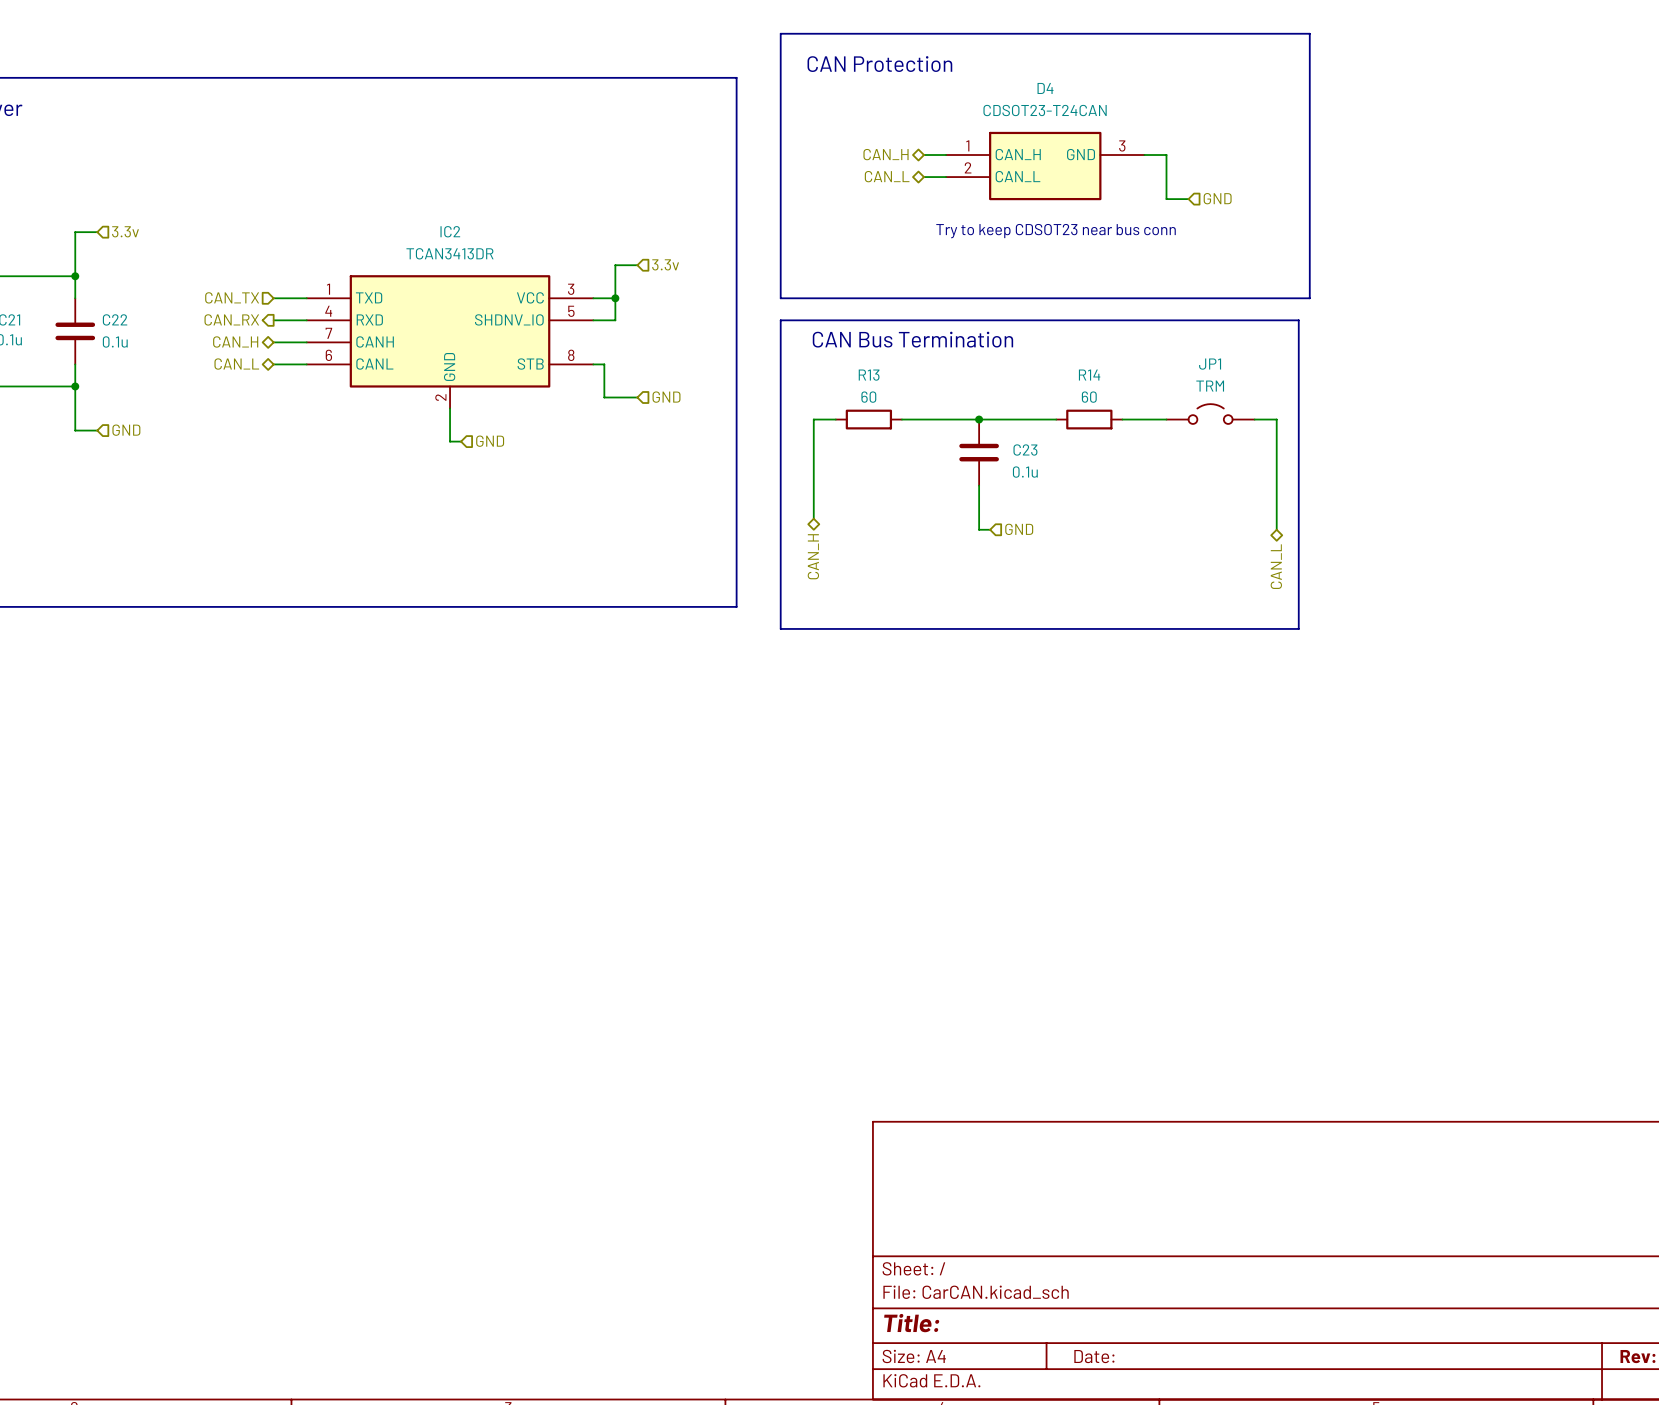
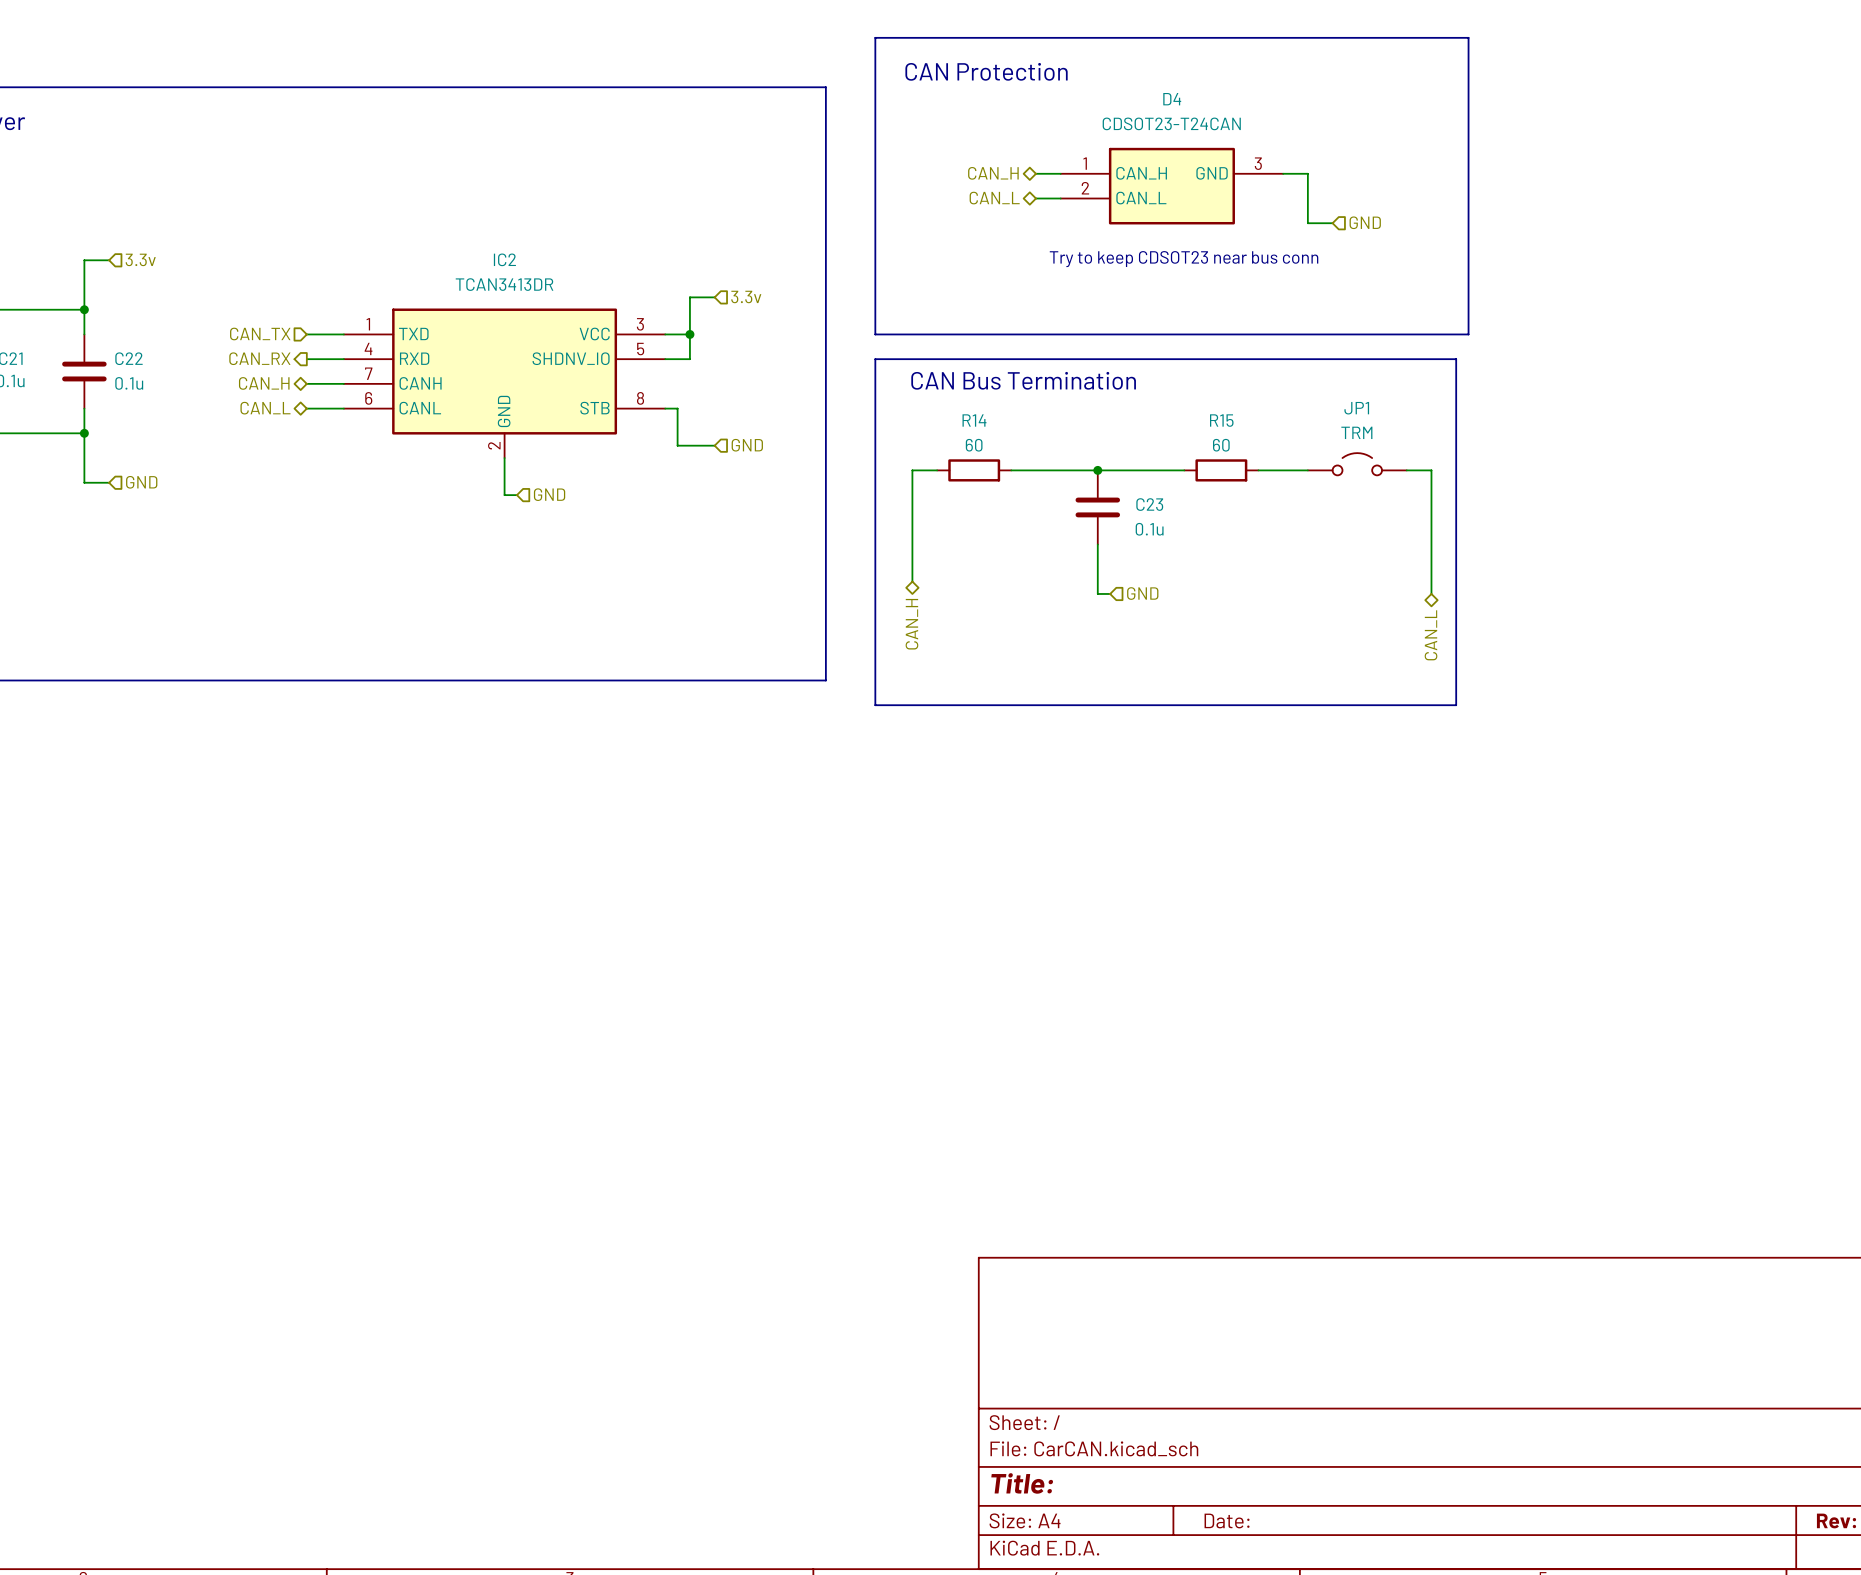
R13 name: R13 (869, 375) -> R14 (974, 420)
R14 name: R14 (1089, 375) -> R15 (1221, 420)

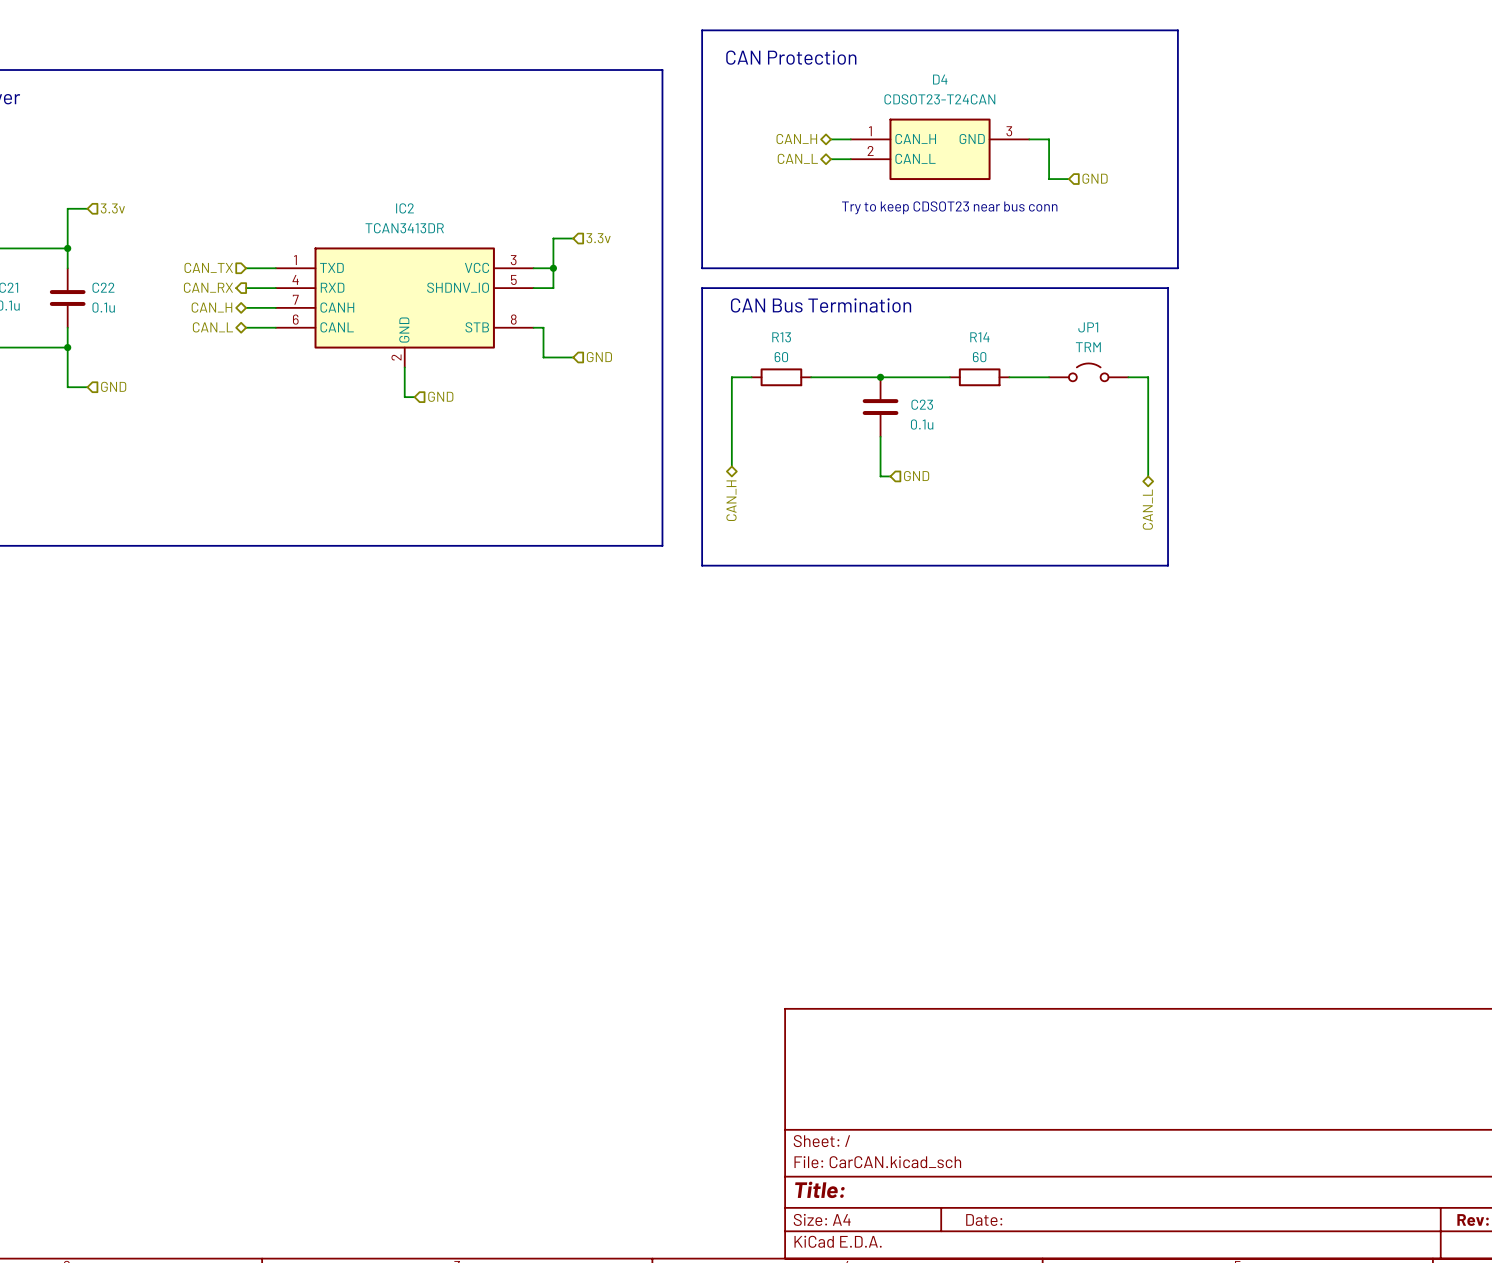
R14 name: R14 (974, 420) -> R13 (781, 337)
R15 name: R15 (1221, 420) -> R14 (979, 337)

